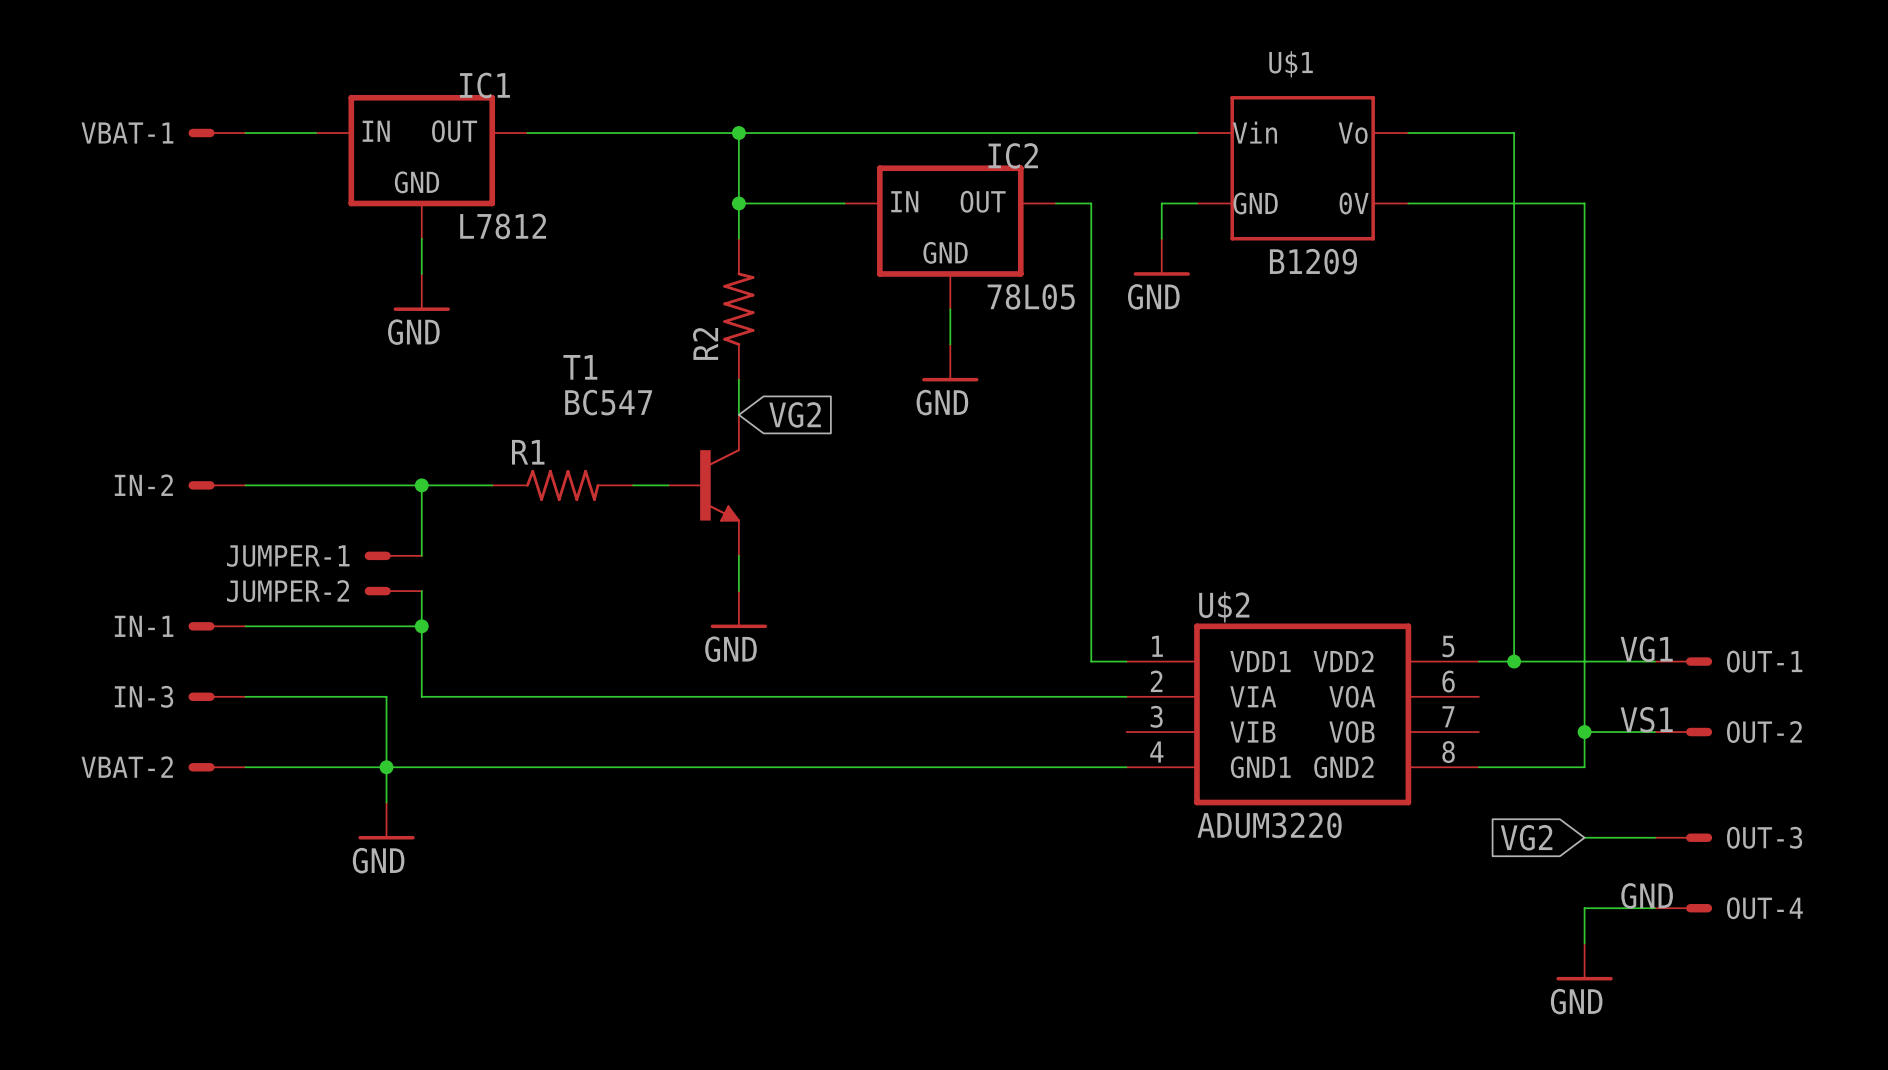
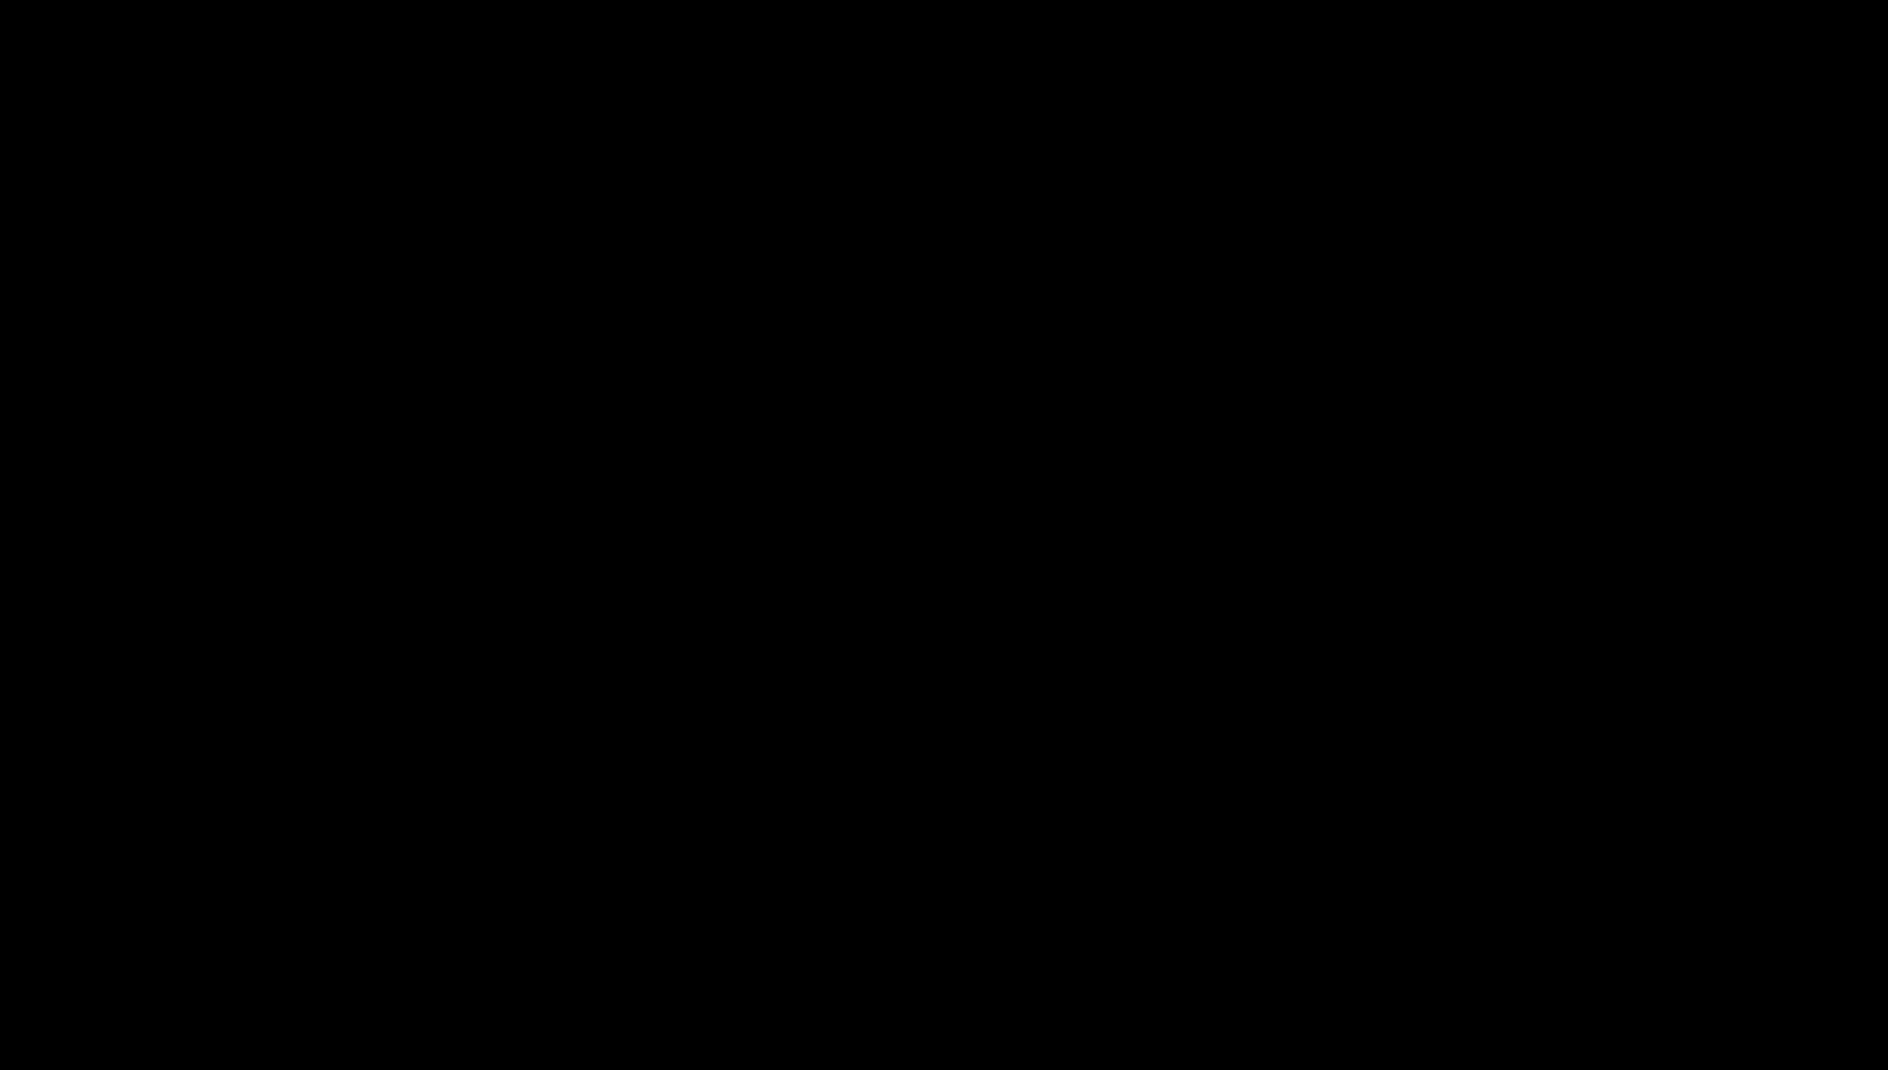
VBAT-1: (217, 133) -> none
wire: (245, 133) (316, 133) -> none
wire: (527, 133) (1196, 133) -> none
wire: (738, 133) (738, 238) -> none
junction: (738, 133) -> none
wire: (1408, 133) (1514, 133) (1514, 661) -> none
IC1: L7812 (421, 166) -> none
U$1: B1209 (1302, 168) -> none
wire: (738, 203) (844, 203) -> none
junction: (738, 203) -> none
wire: (1056, 203) (1091, 203) (1091, 661) (1126, 661) -> none
wire: (1196, 203) (1161, 203) (1161, 238) -> none
wire: (1408, 203) (1584, 203) (1584, 767) (1478, 767) -> none
IC2: 78L05 (950, 237) -> none
wire: (421, 238) (421, 273) -> none
power symbol: GND (1161, 257) -> none
power symbol: GND (421, 292) -> none
R2: (738, 309) -> none
wire: (950, 309) (950, 344) -> none
power symbol: GND (950, 362) -> none
wire: (738, 379) (738, 414) -> none
global label: VG2 (795, 414) -> none
IN-2: (217, 485) -> none
wire: (245, 485) (492, 485) -> none
wire: (421, 485) (421, 555) -> none
junction: (421, 485) -> none
R1: (562, 485) -> none
wire: (633, 485) (668, 485) -> none
T1: BC547 (704, 485) -> none
JUMPER-1: (393, 555) -> none
wire: (738, 555) (738, 591) -> none
JUMPER-2: (393, 591) -> none
wire: (421, 591) (421, 696) (1126, 696) -> none
power symbol: GND (738, 609) -> none
IN-1: (217, 626) -> none
wire: (245, 626) (421, 626) -> none
junction: (421, 626) -> none
label: VG1 (1646, 649) -> none
wire: (1478, 661) (1655, 661) -> none
junction: (1514, 661) -> none
OUT-1: (1683, 661) -> none
IN-3: (217, 696) -> none
wire: (245, 696) (386, 696) (386, 802) -> none
U$2: ADUM3220 (1302, 714) -> none
label: VS1 (1646, 719) -> none
wire: (1584, 732) (1655, 732) -> none
junction: (1584, 732) -> none
OUT-2: (1683, 732) -> none
VBAT-2: (217, 767) -> none
wire: (245, 767) (1126, 767) -> none
junction: (386, 767) -> none
power symbol: GND (386, 821) -> none
global label: VG2 (1526, 837) -> none
wire: (1584, 837) (1655, 837) -> none
OUT-3: (1683, 837) -> none
label: GND (1647, 895) -> none
wire: (1655, 908) (1584, 908) (1584, 943) -> none
OUT-4: (1683, 908) -> none
power symbol: GND (1584, 961) -> none

